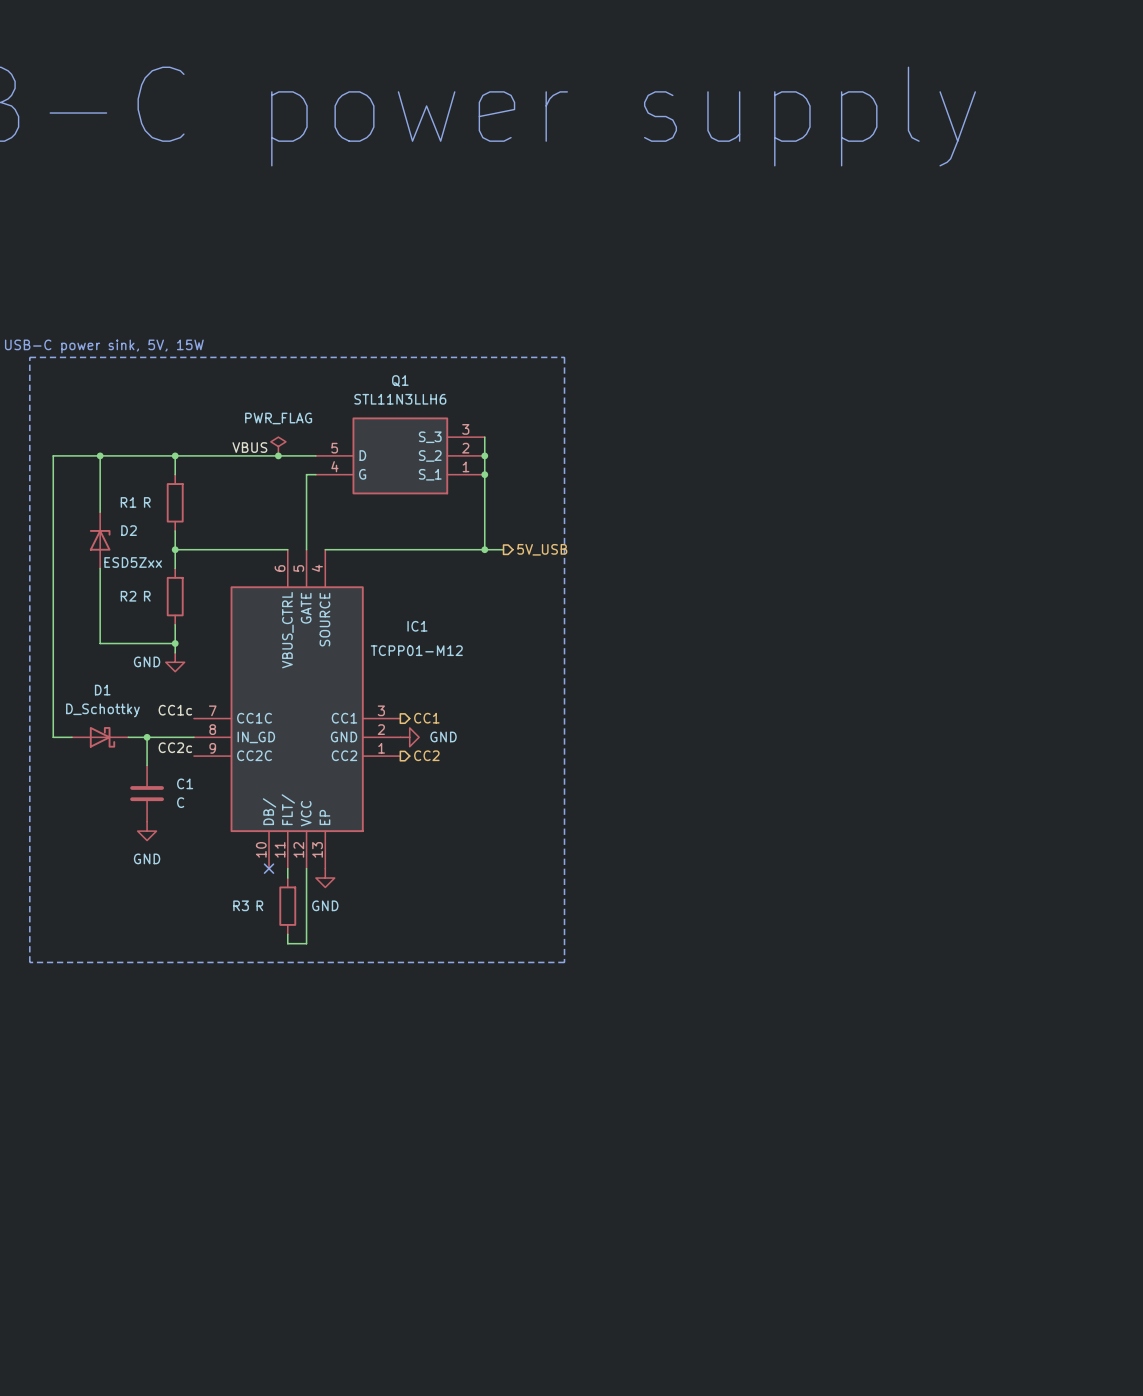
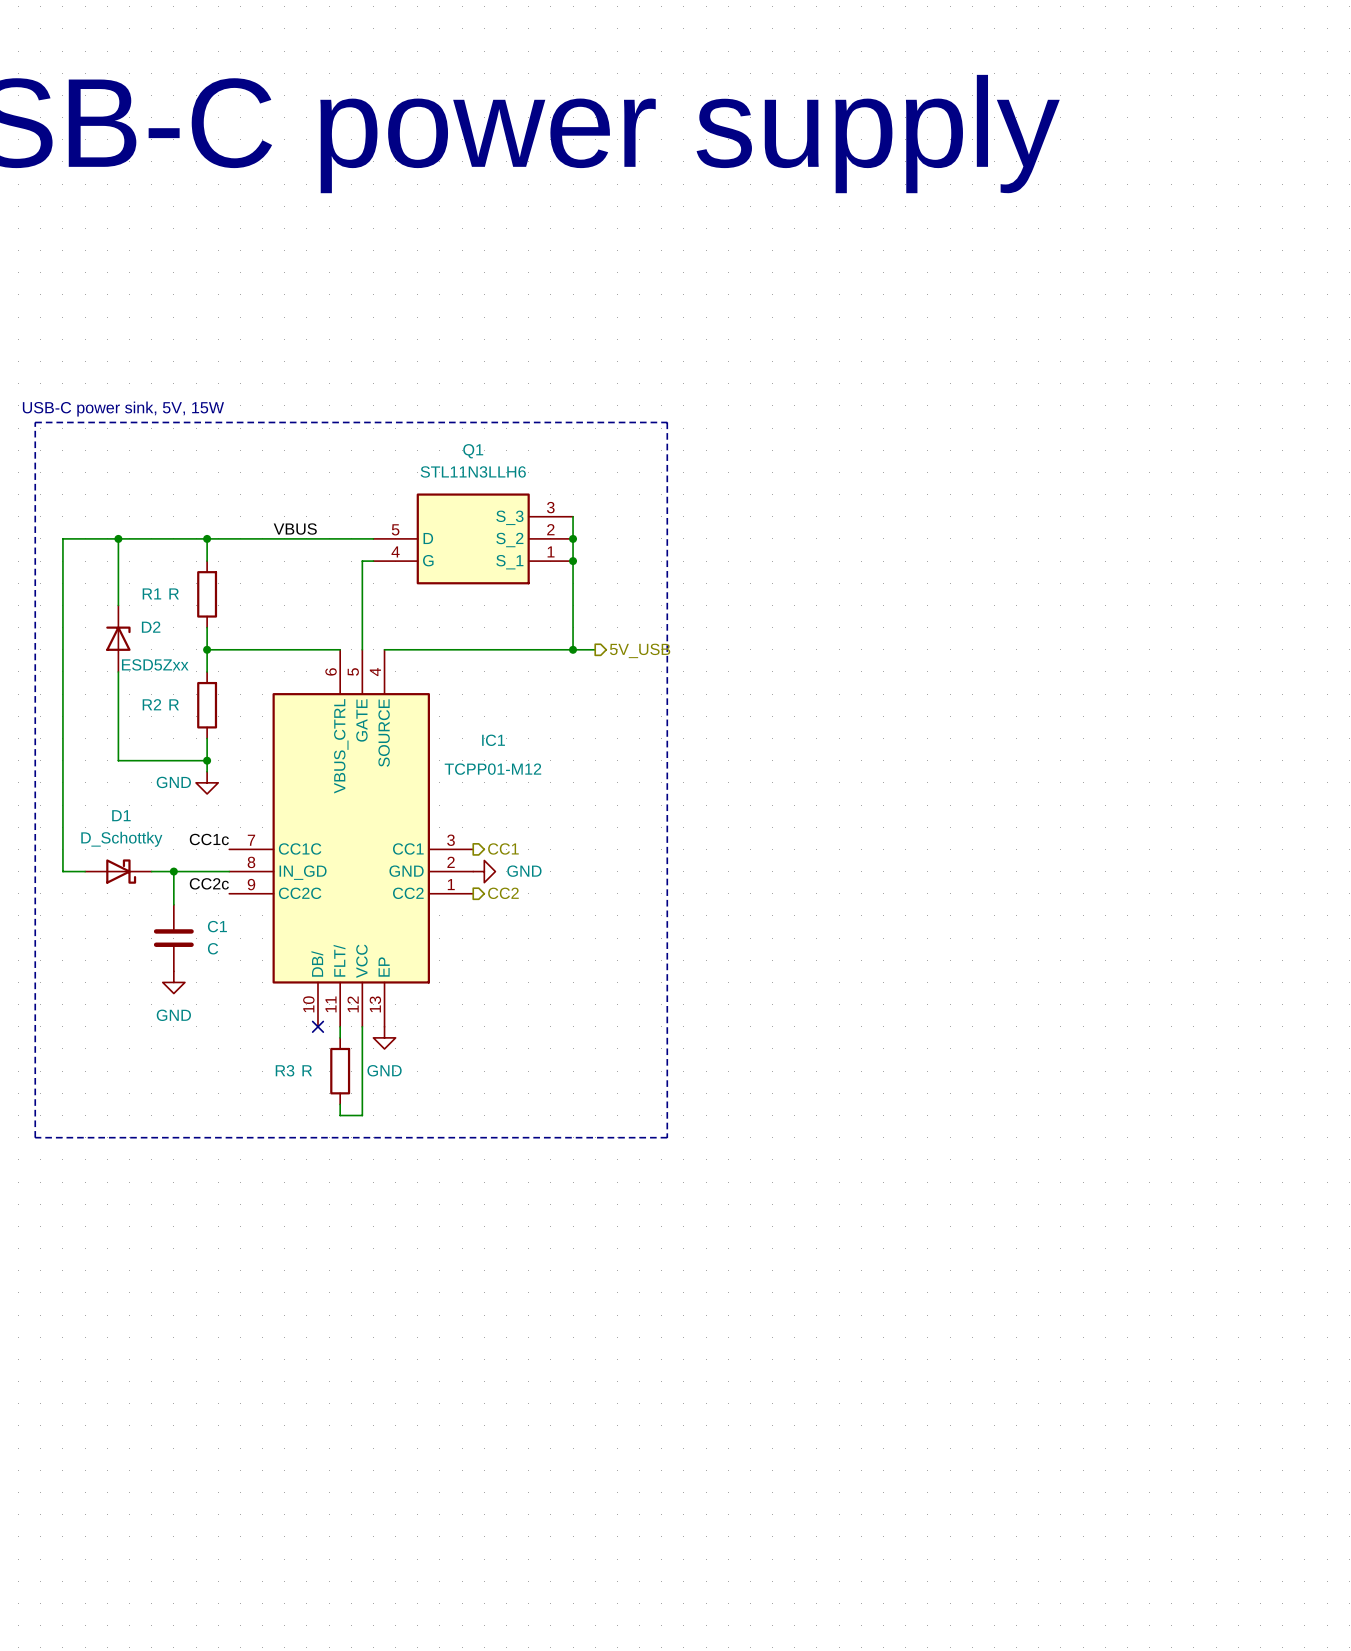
power symbol: PWR_FLAG (278, 446) -> none
junction: (278, 455) -> none

